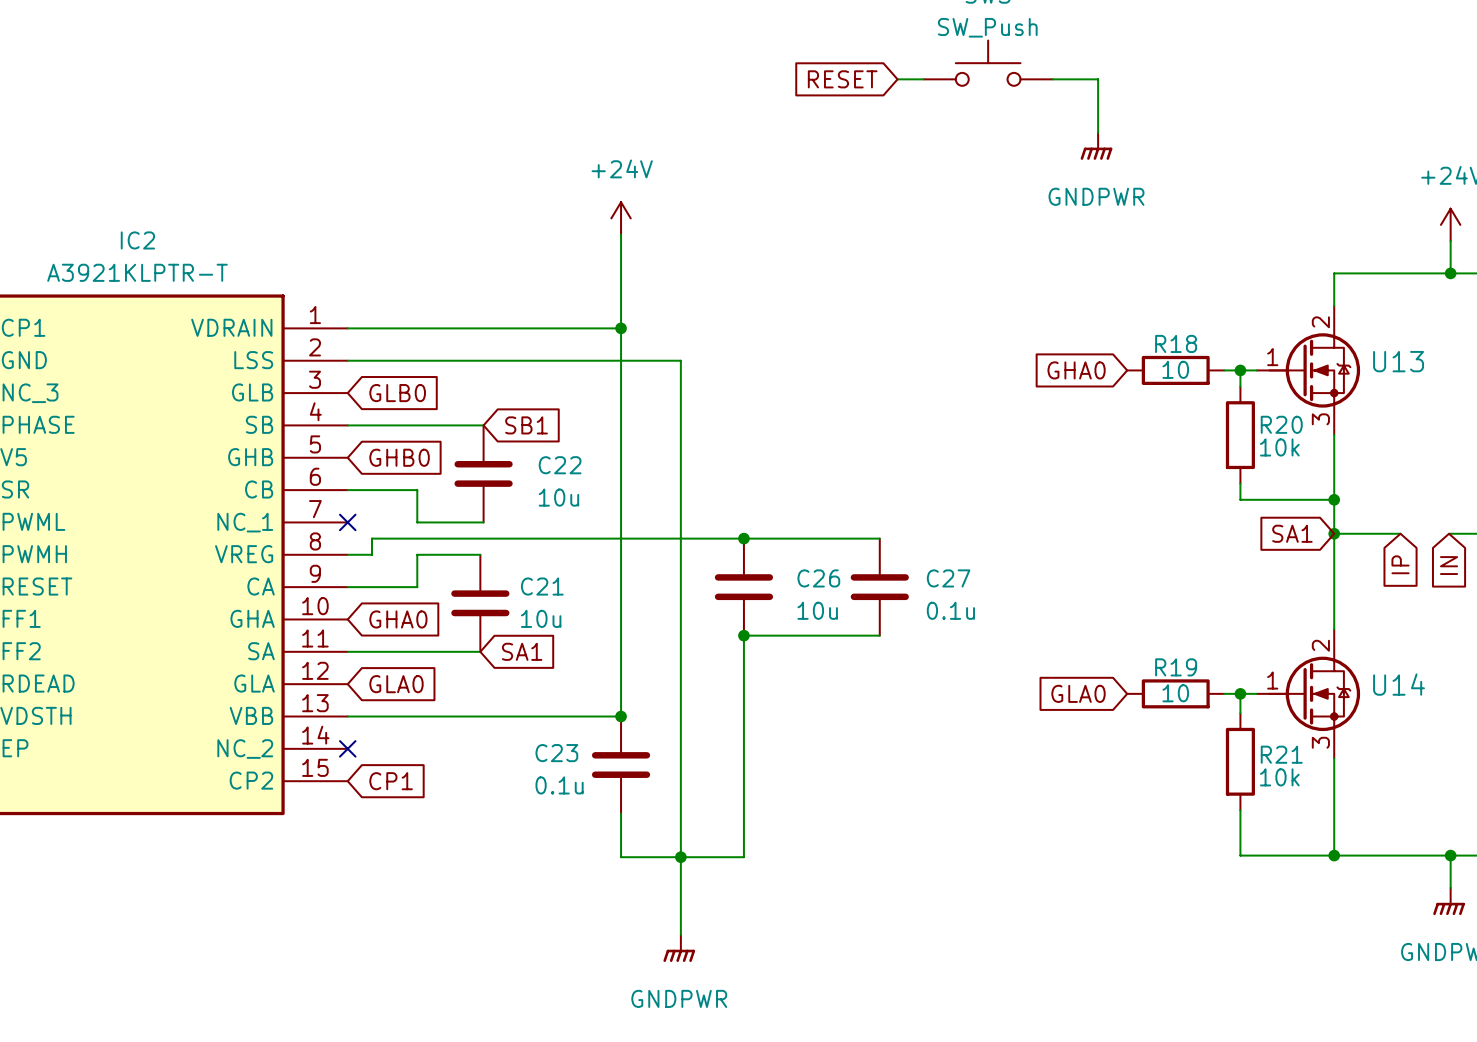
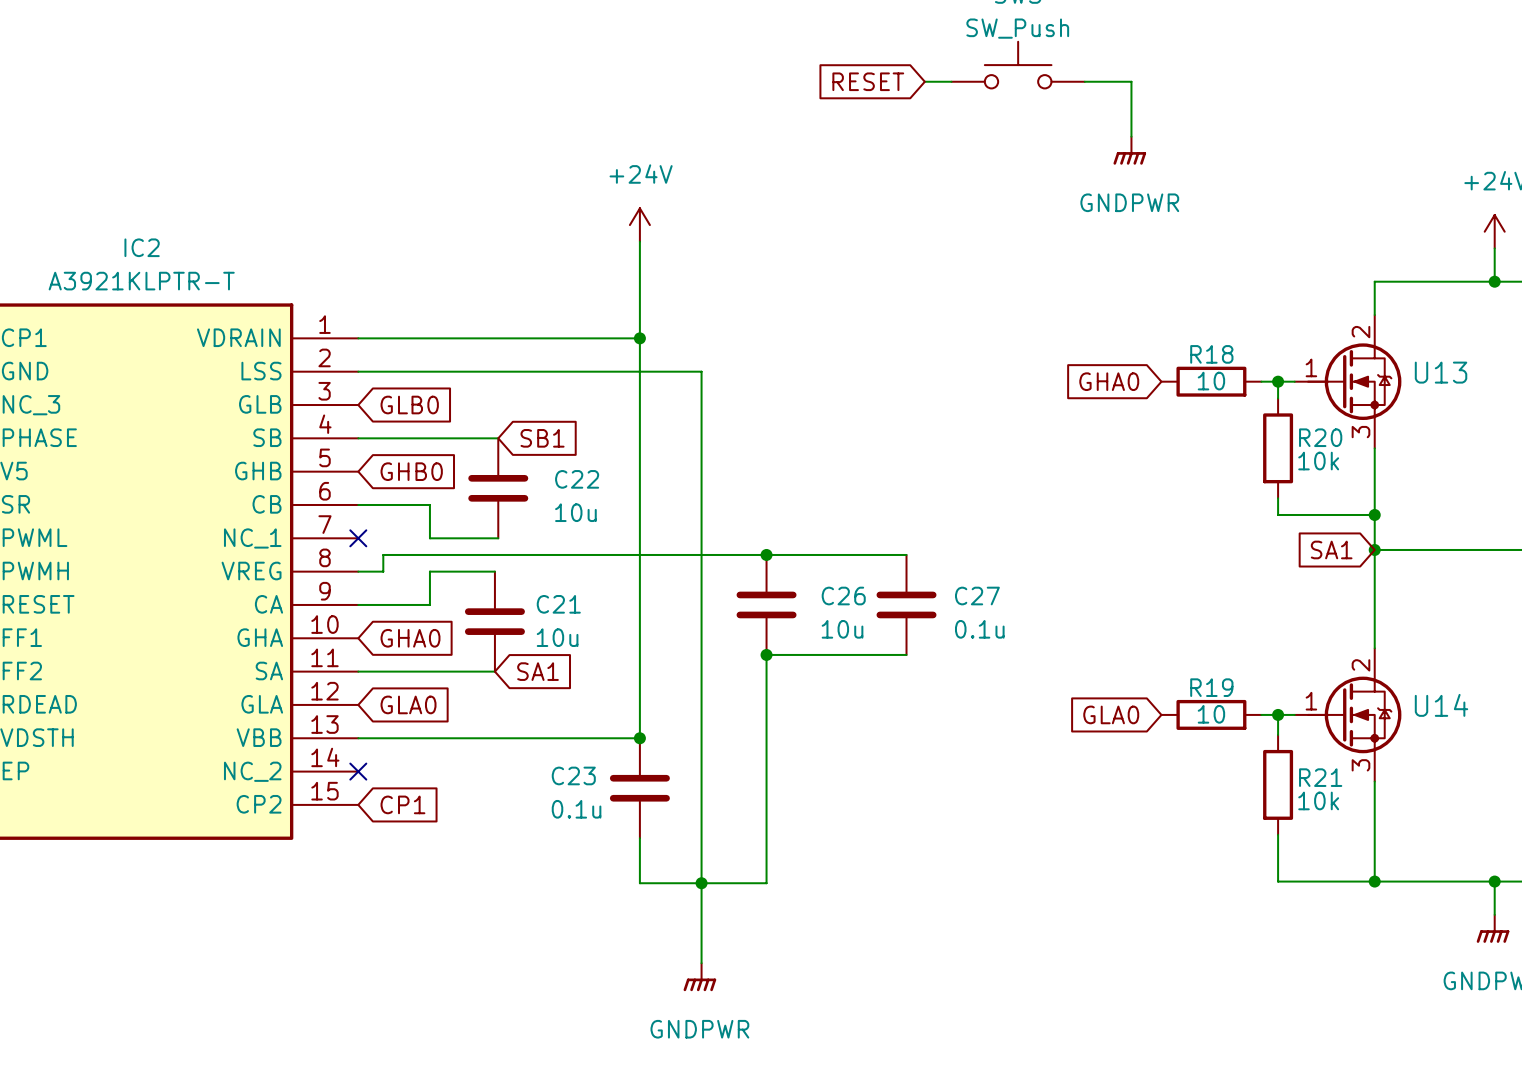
wire: none -> (1443, 549) (1493, 549)
global label: IP (1400, 564) -> none
global label: IN (1449, 565) -> none

